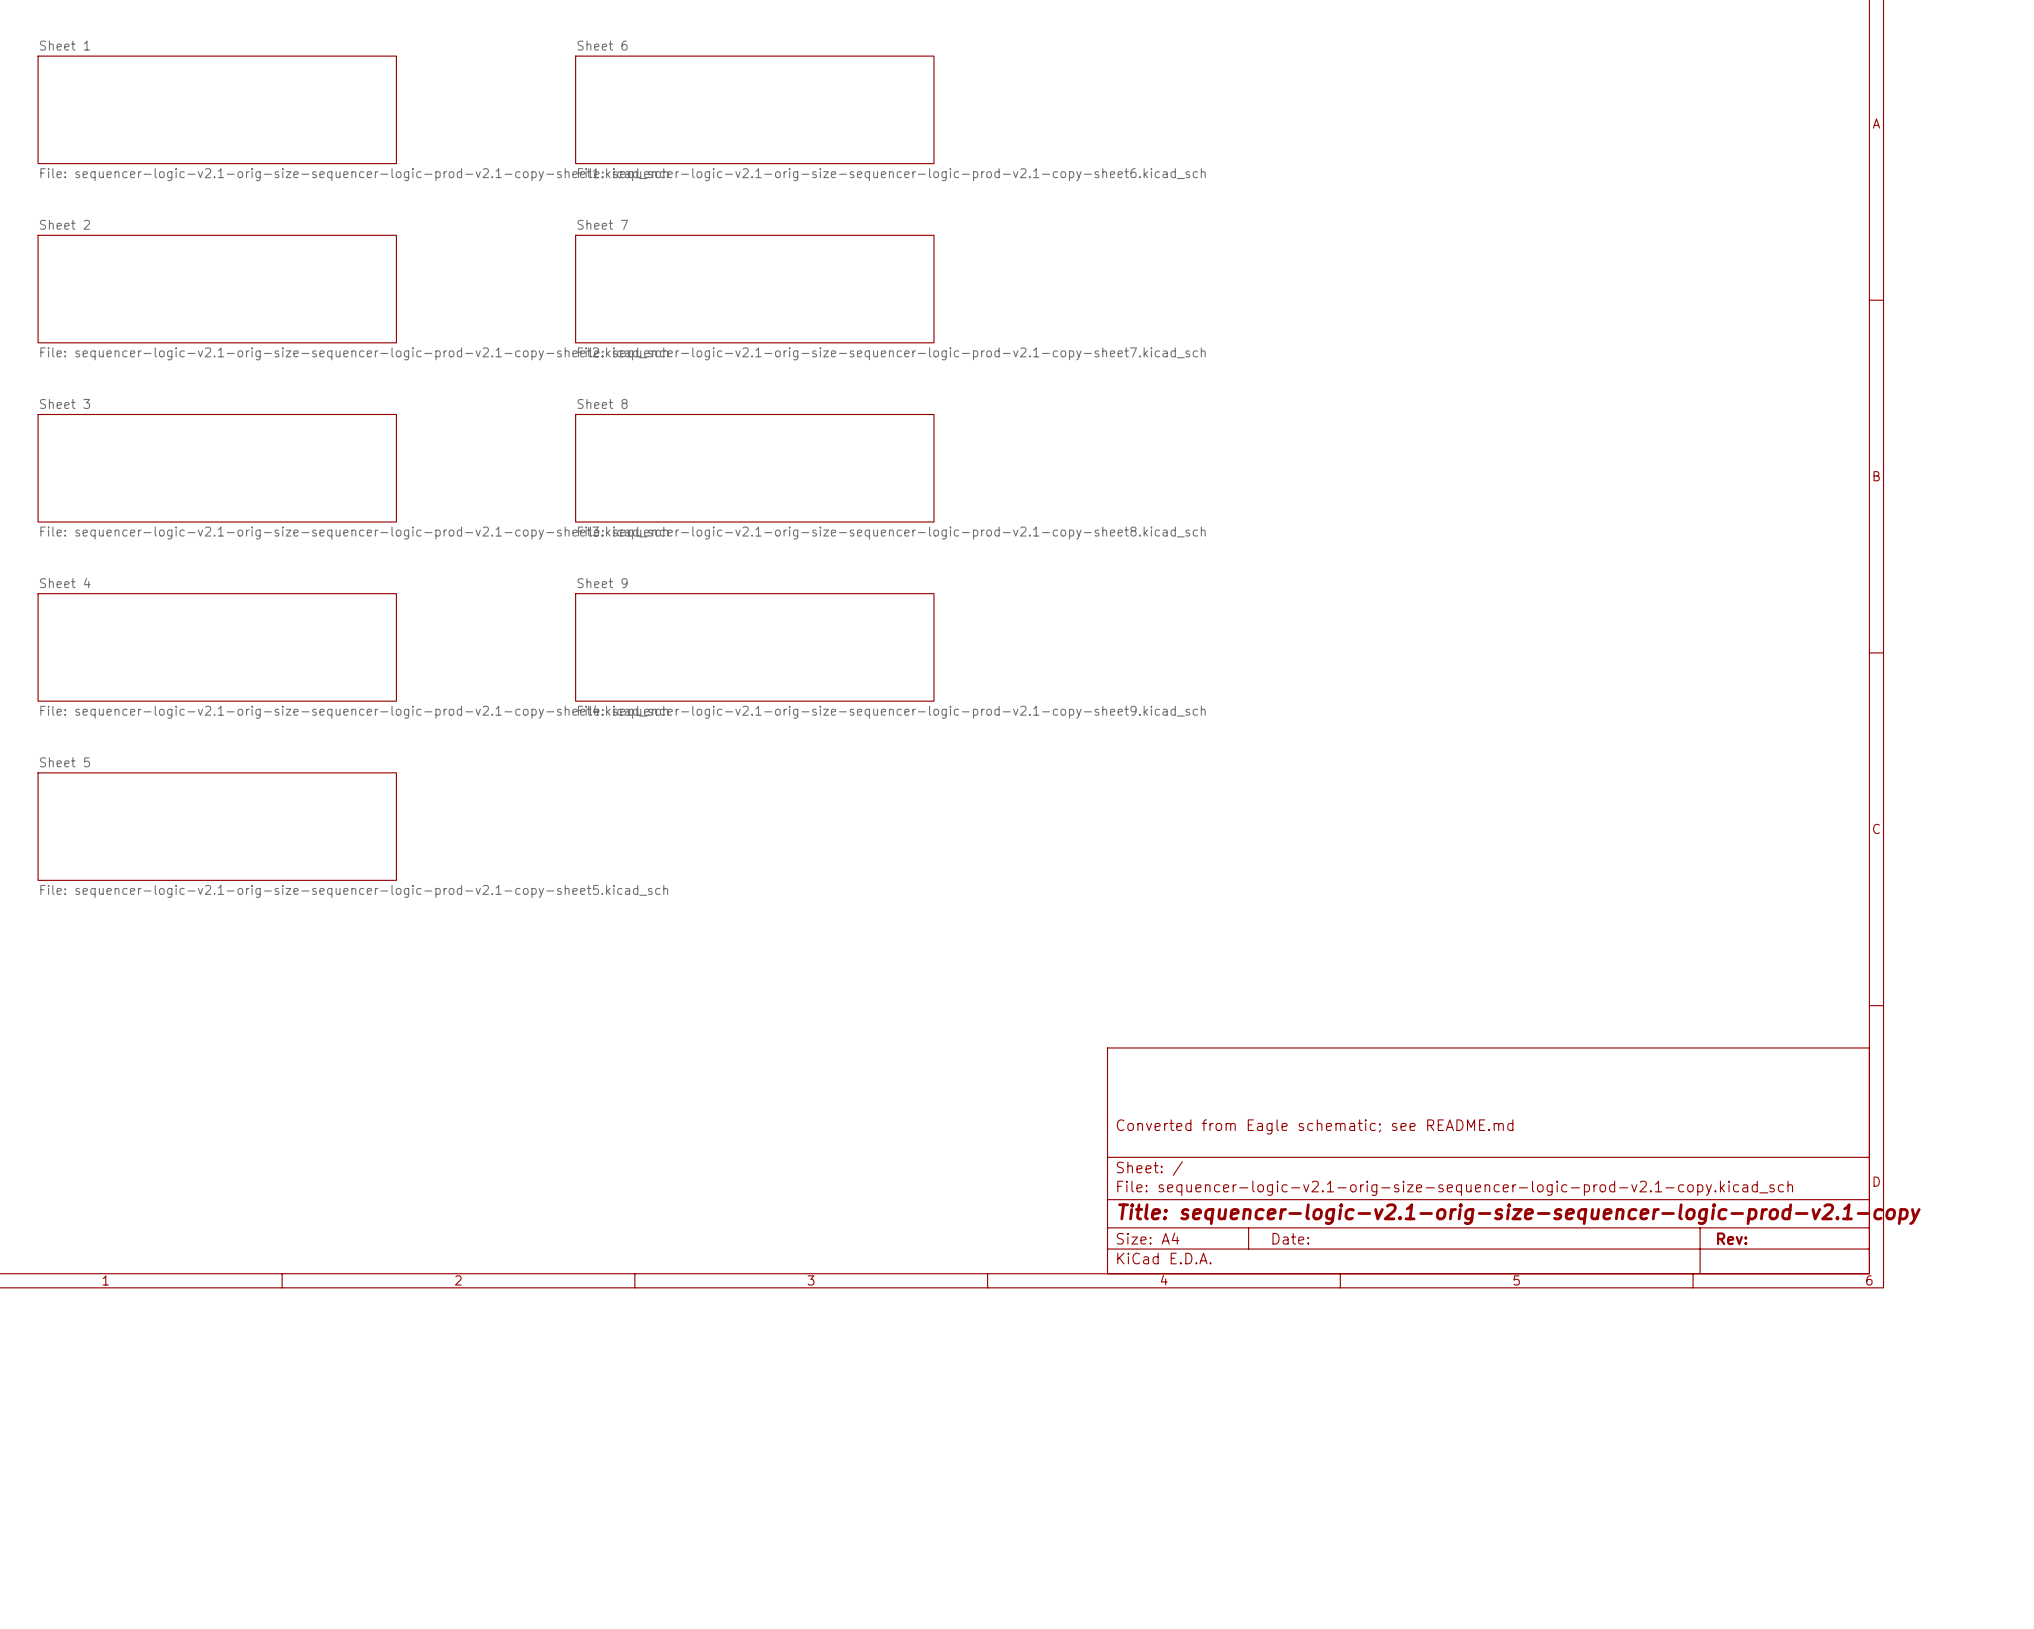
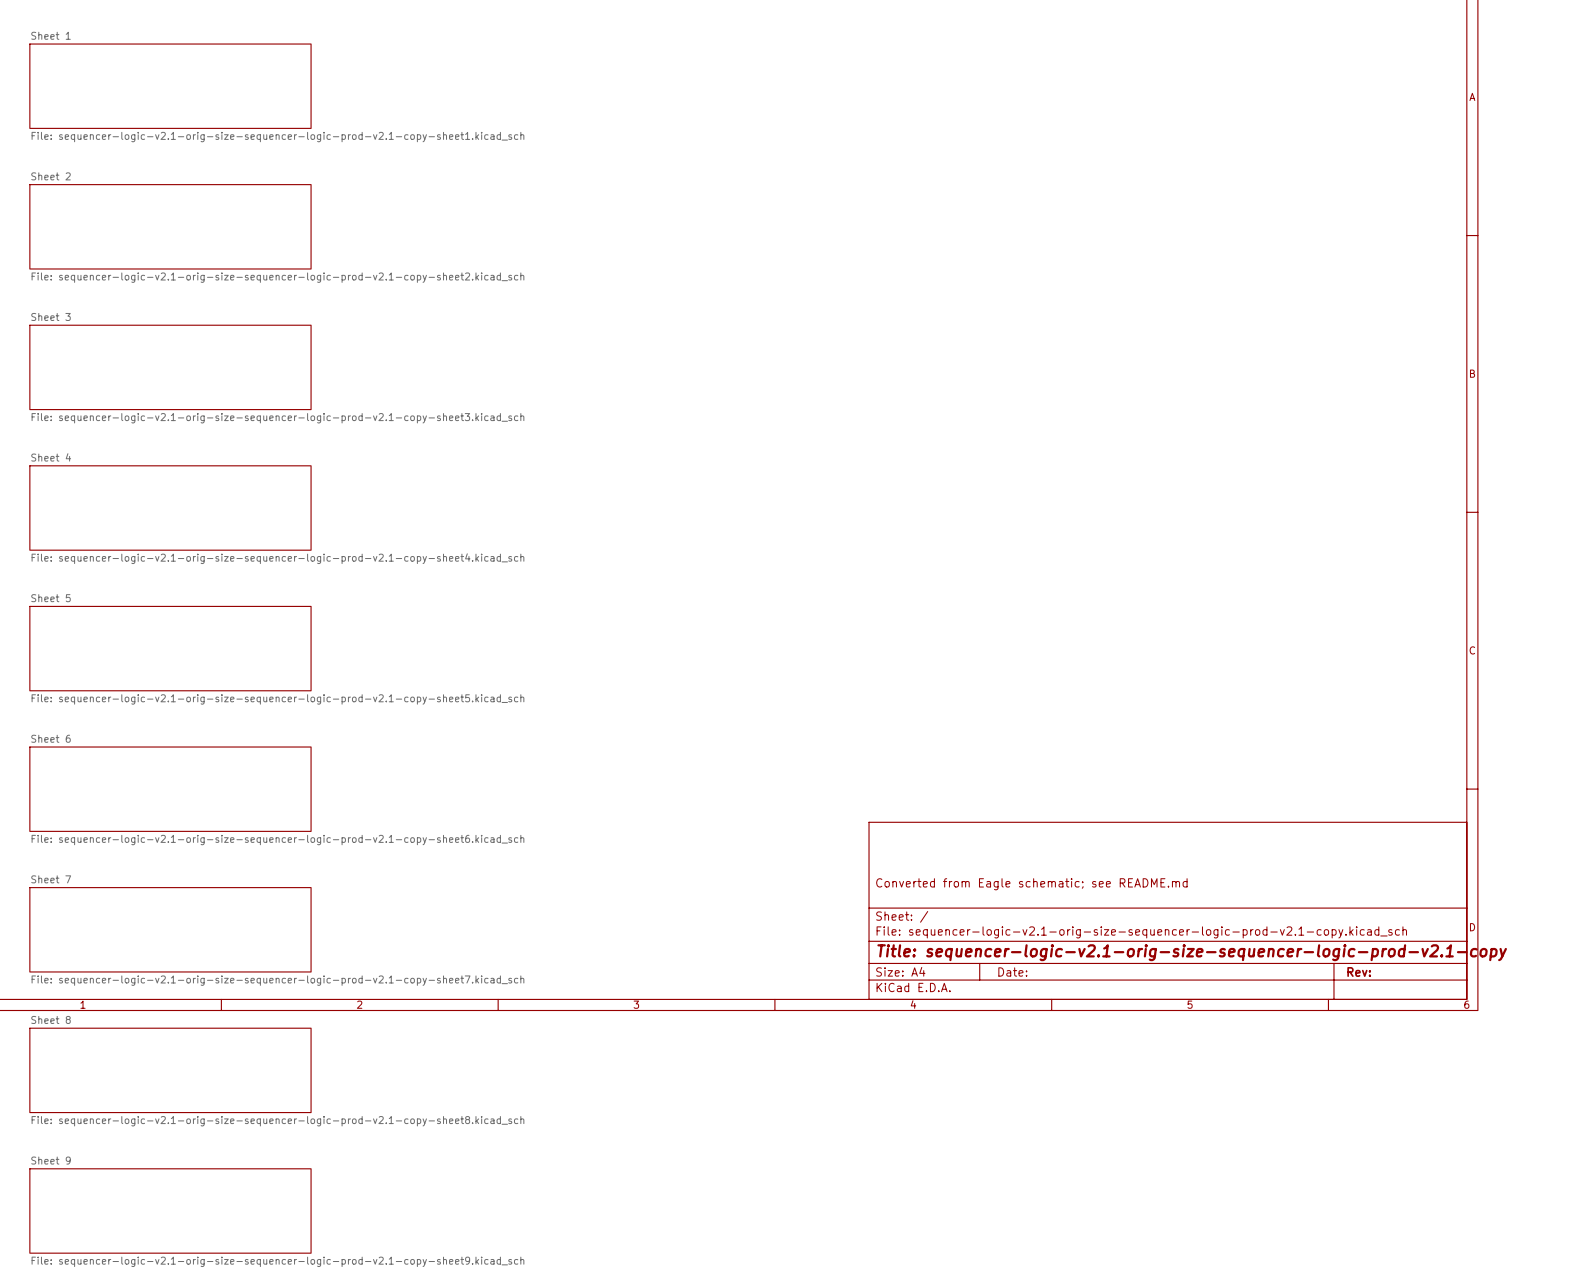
sheet Sheet 6 position: (754, 109) -> (170, 789)
sheet Sheet 7 position: (754, 289) -> (170, 929)
sheet Sheet 8 position: (754, 468) -> (170, 1070)
sheet Sheet 9 position: (754, 647) -> (170, 1210)

